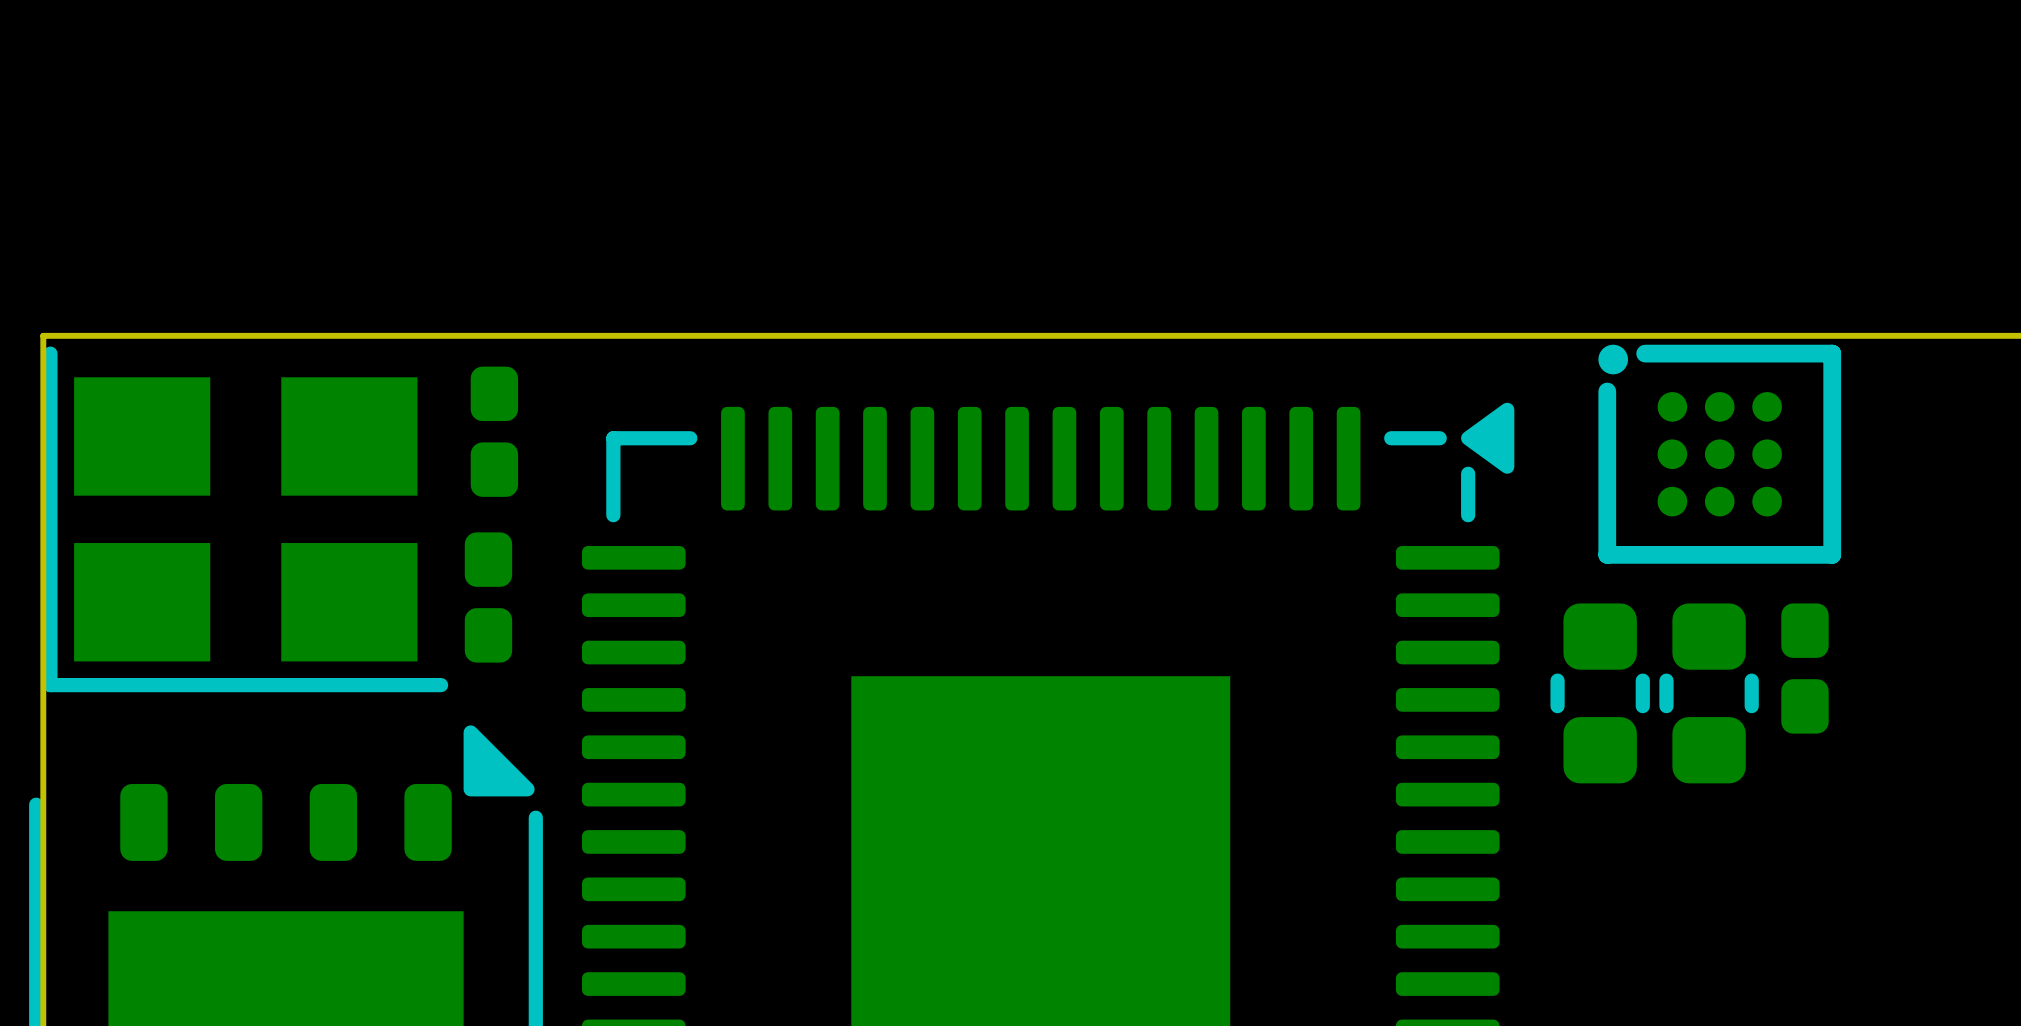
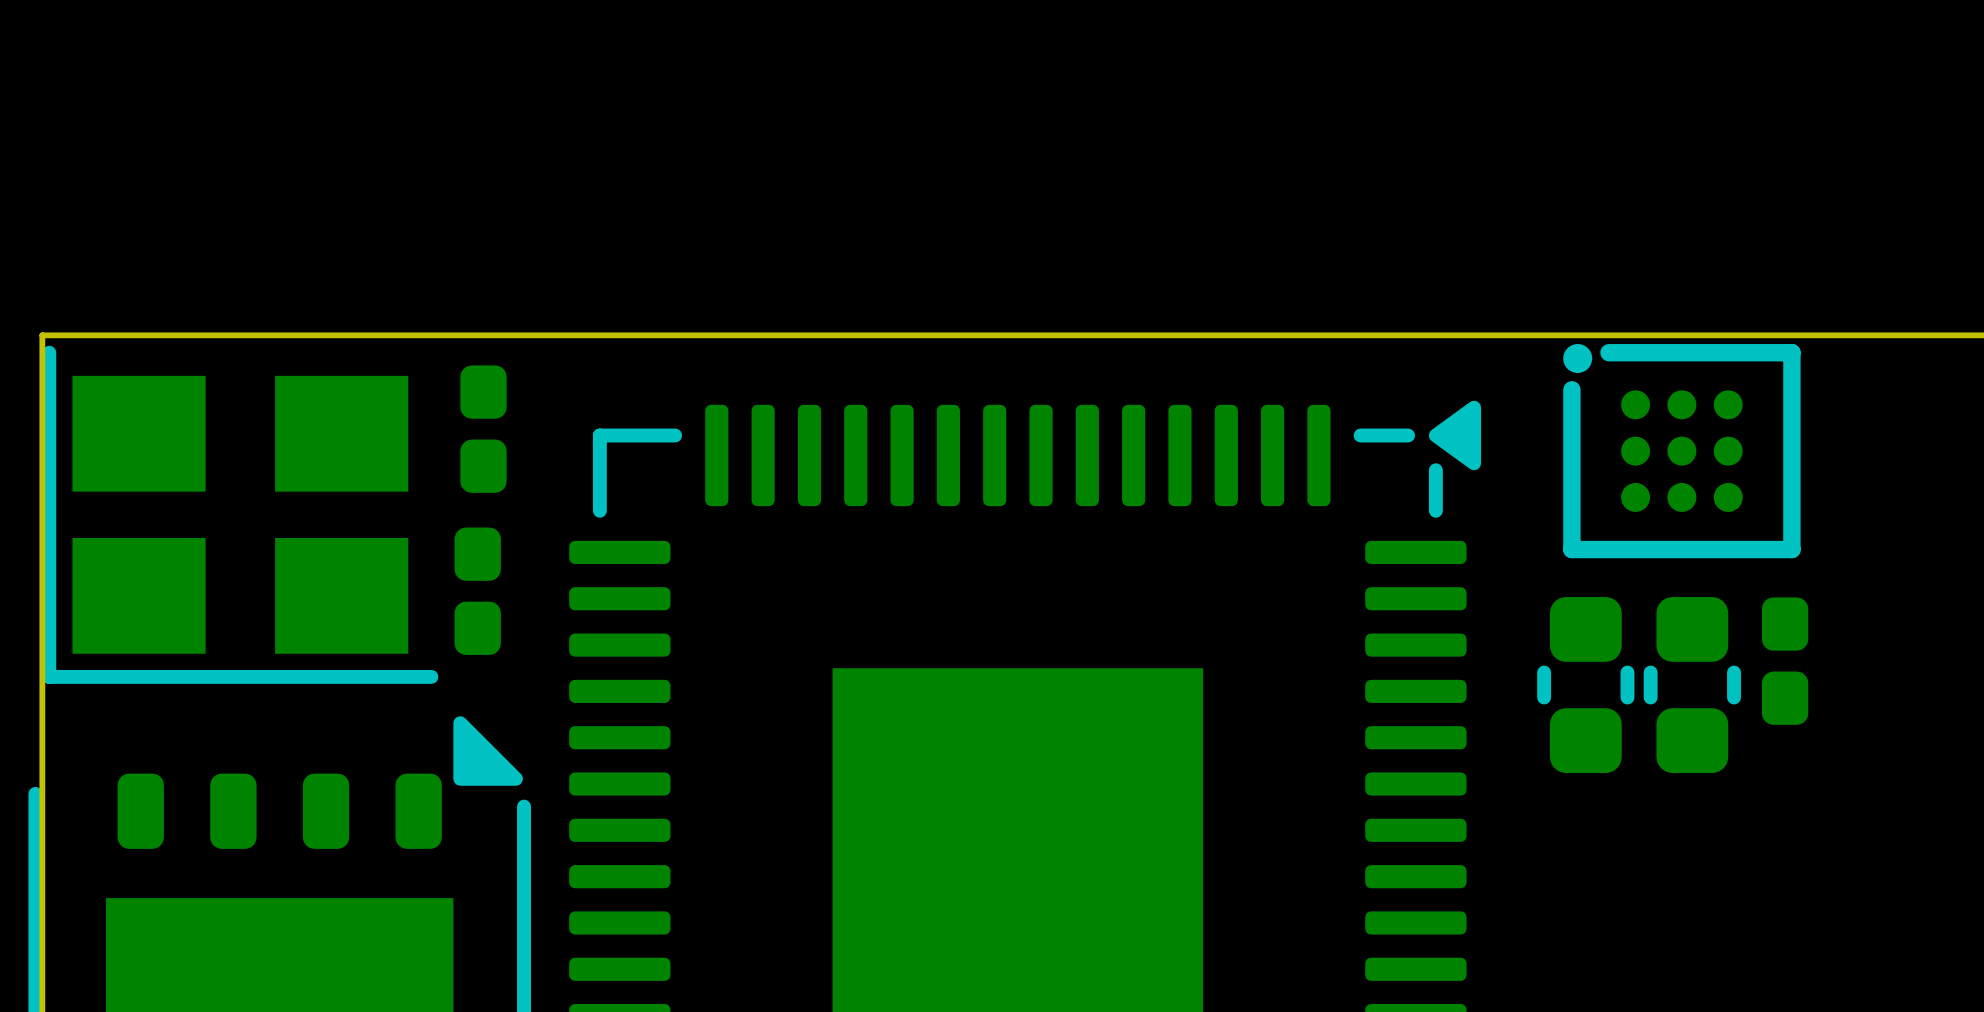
part position: (1804, 668) -> (1785, 661)
part position: (1600, 693) -> (1585, 685)
part position: (1709, 693) -> (1692, 685)

